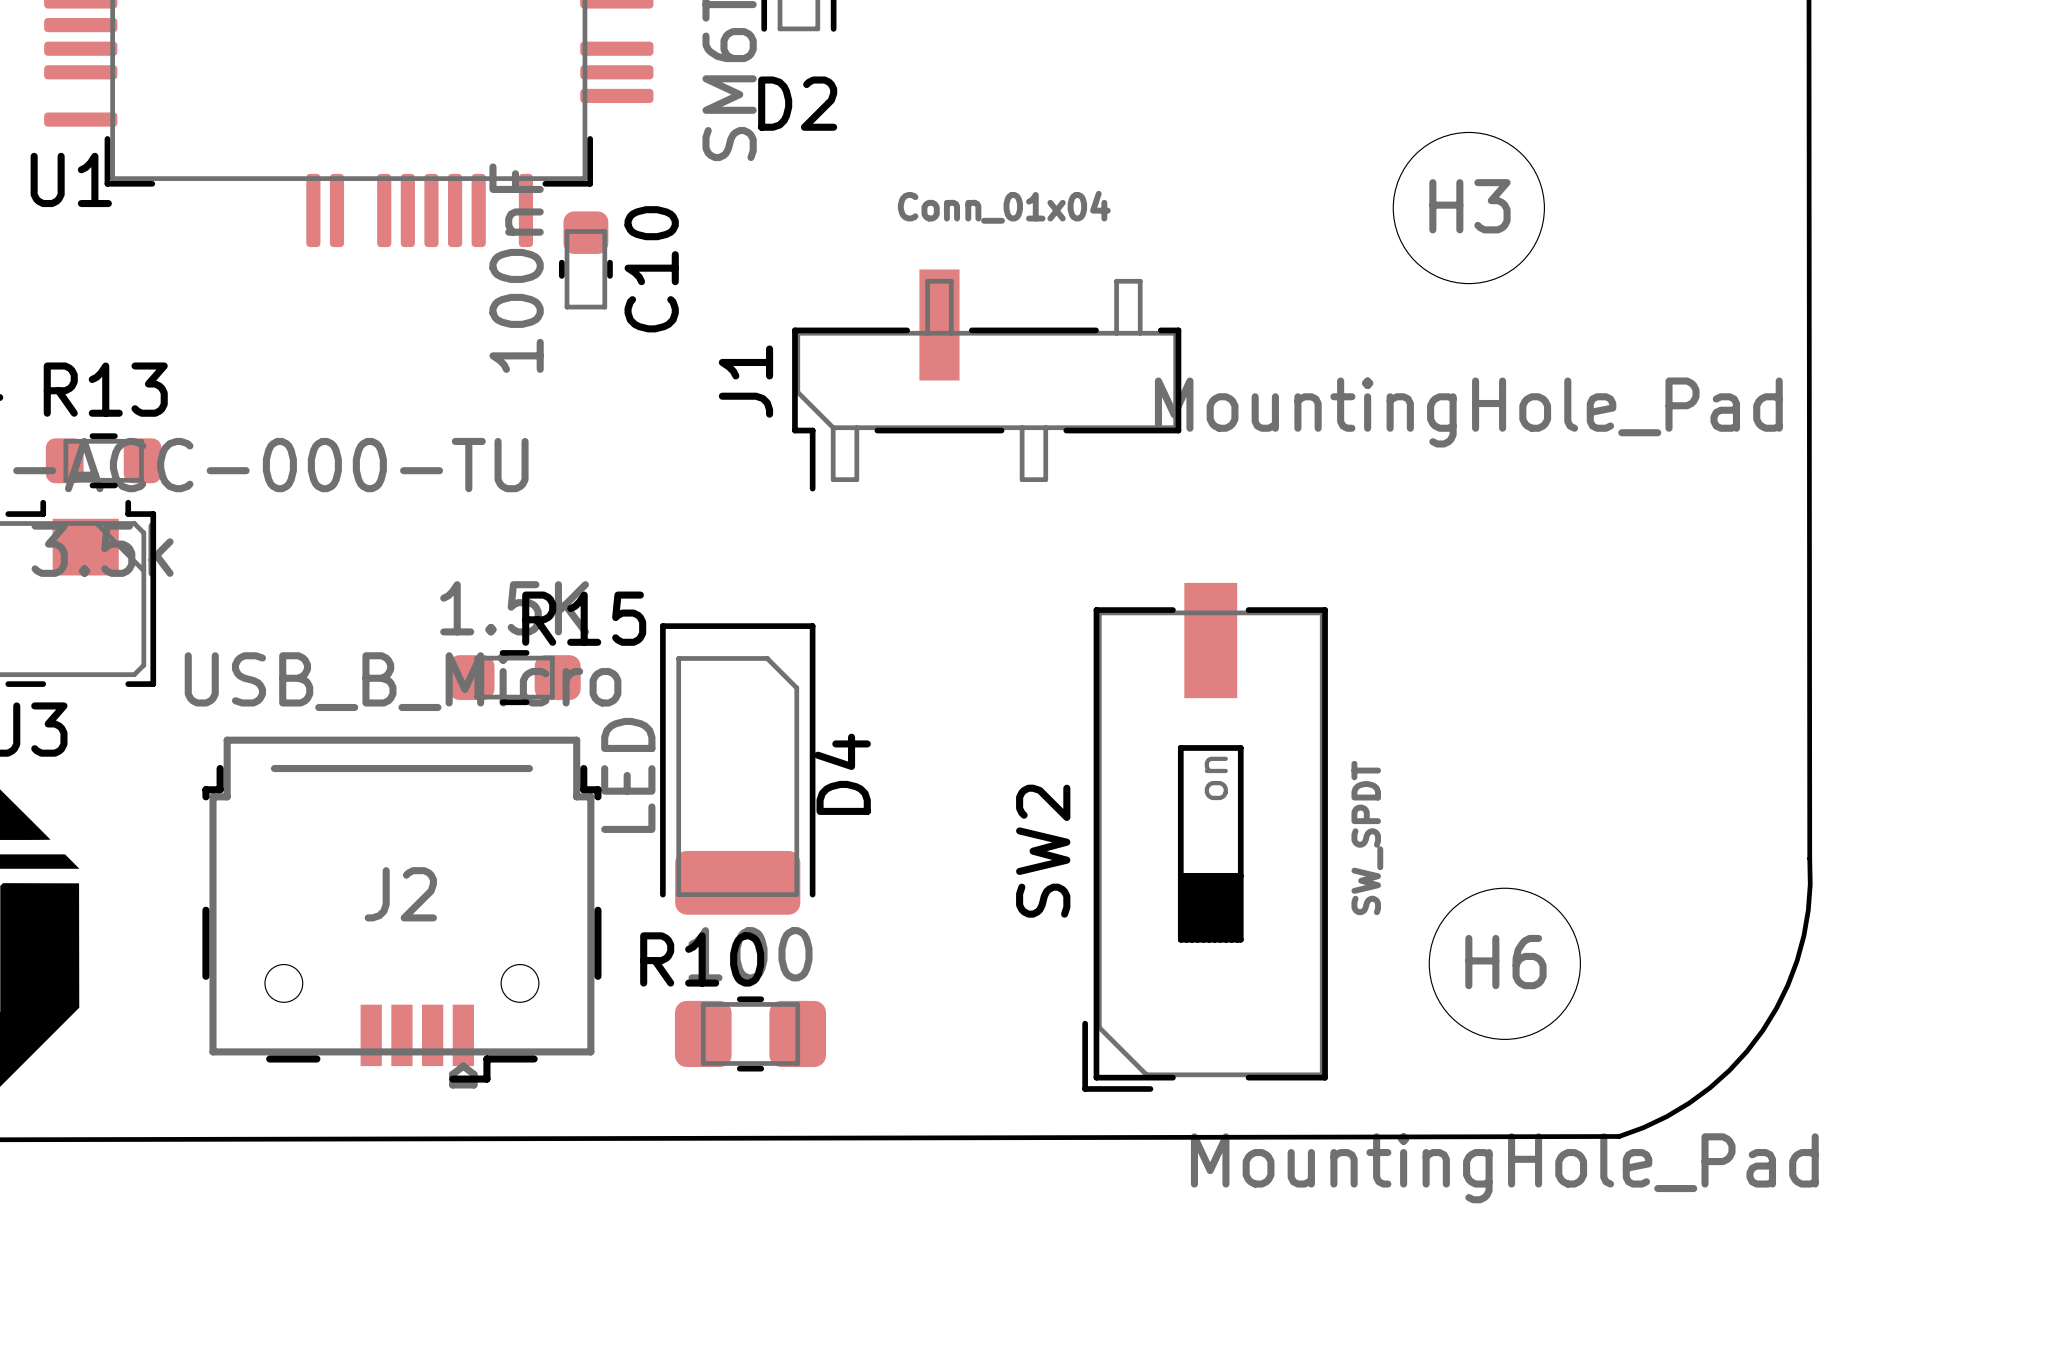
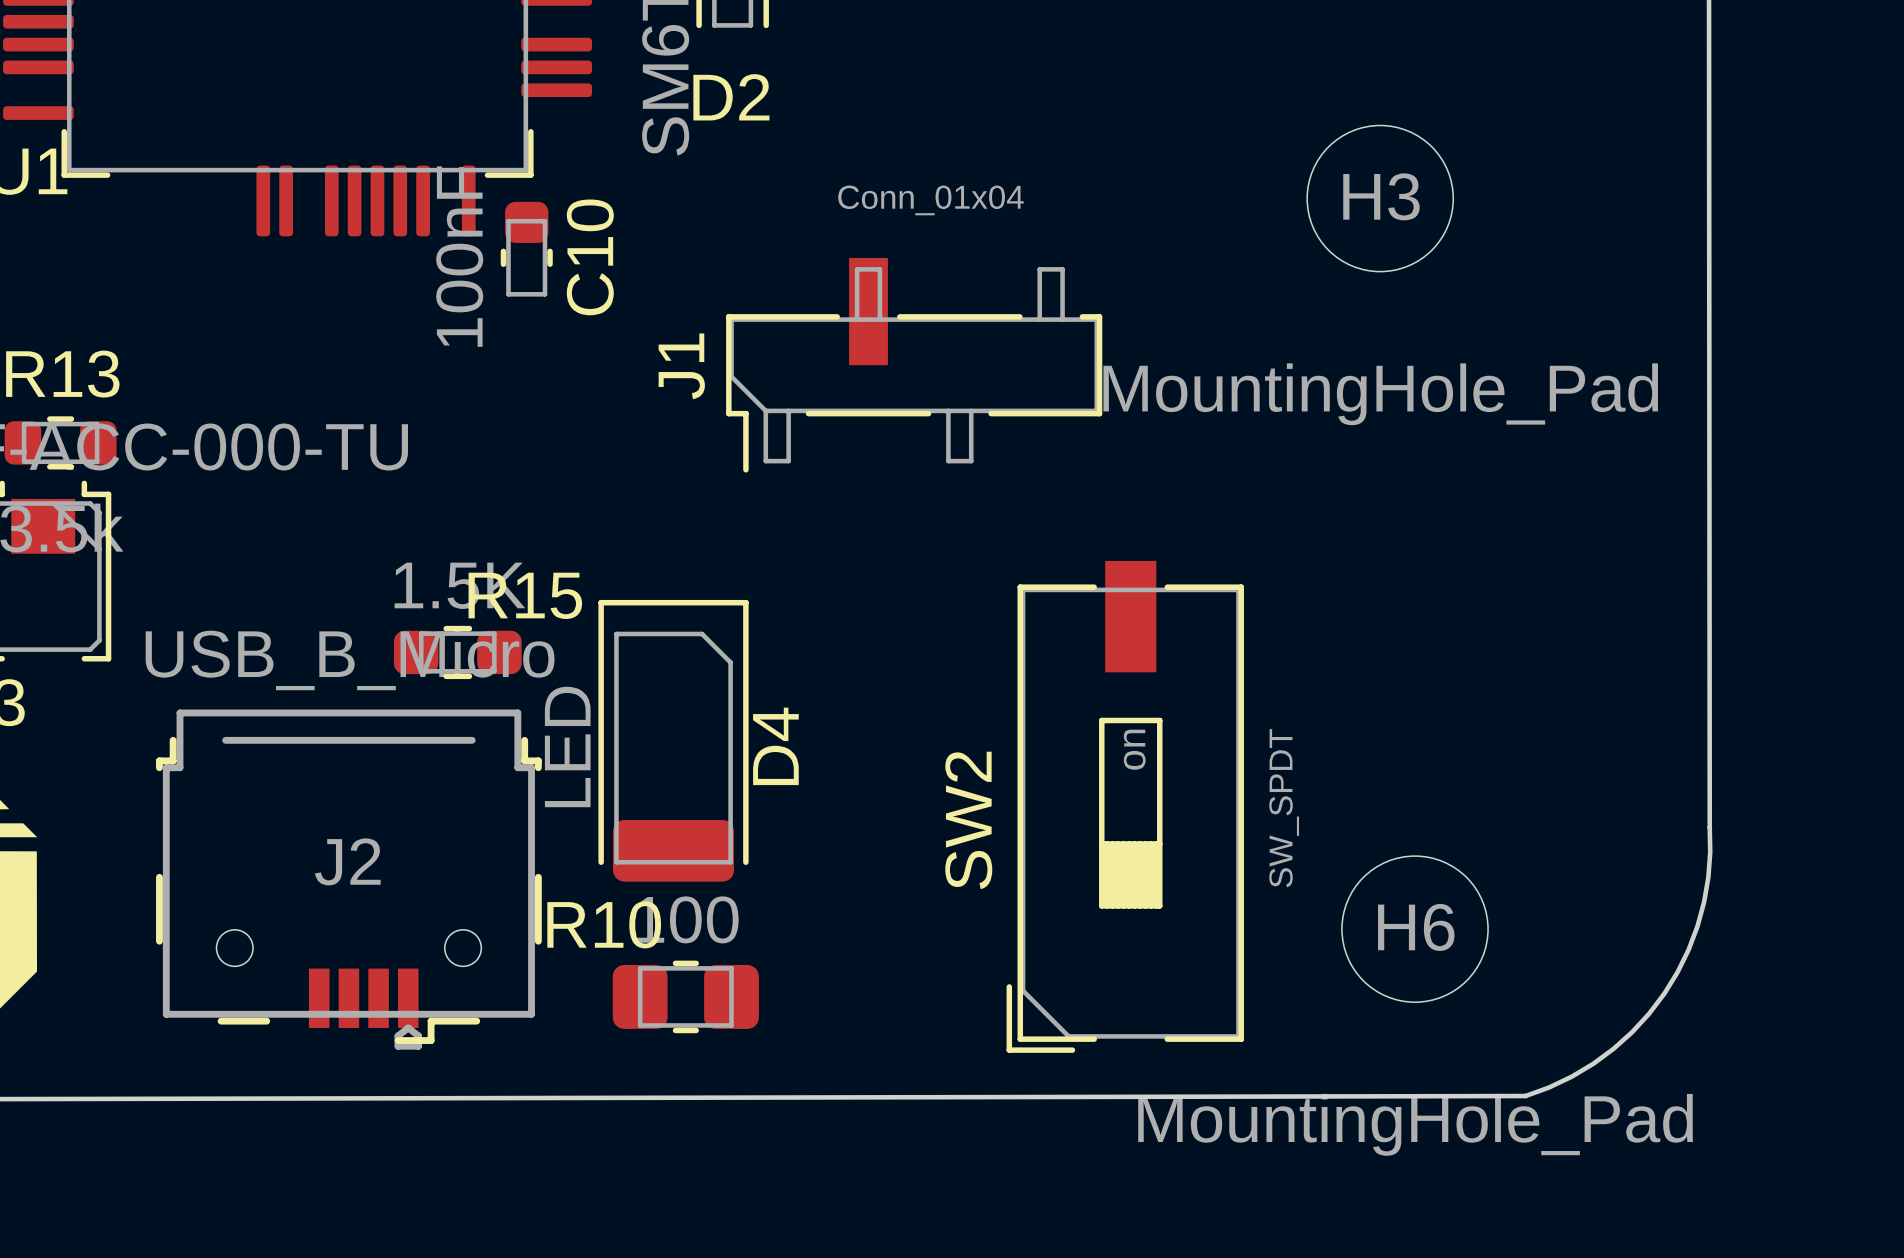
R10 name position: R10 (702, 959) -> R10 (604, 924)

